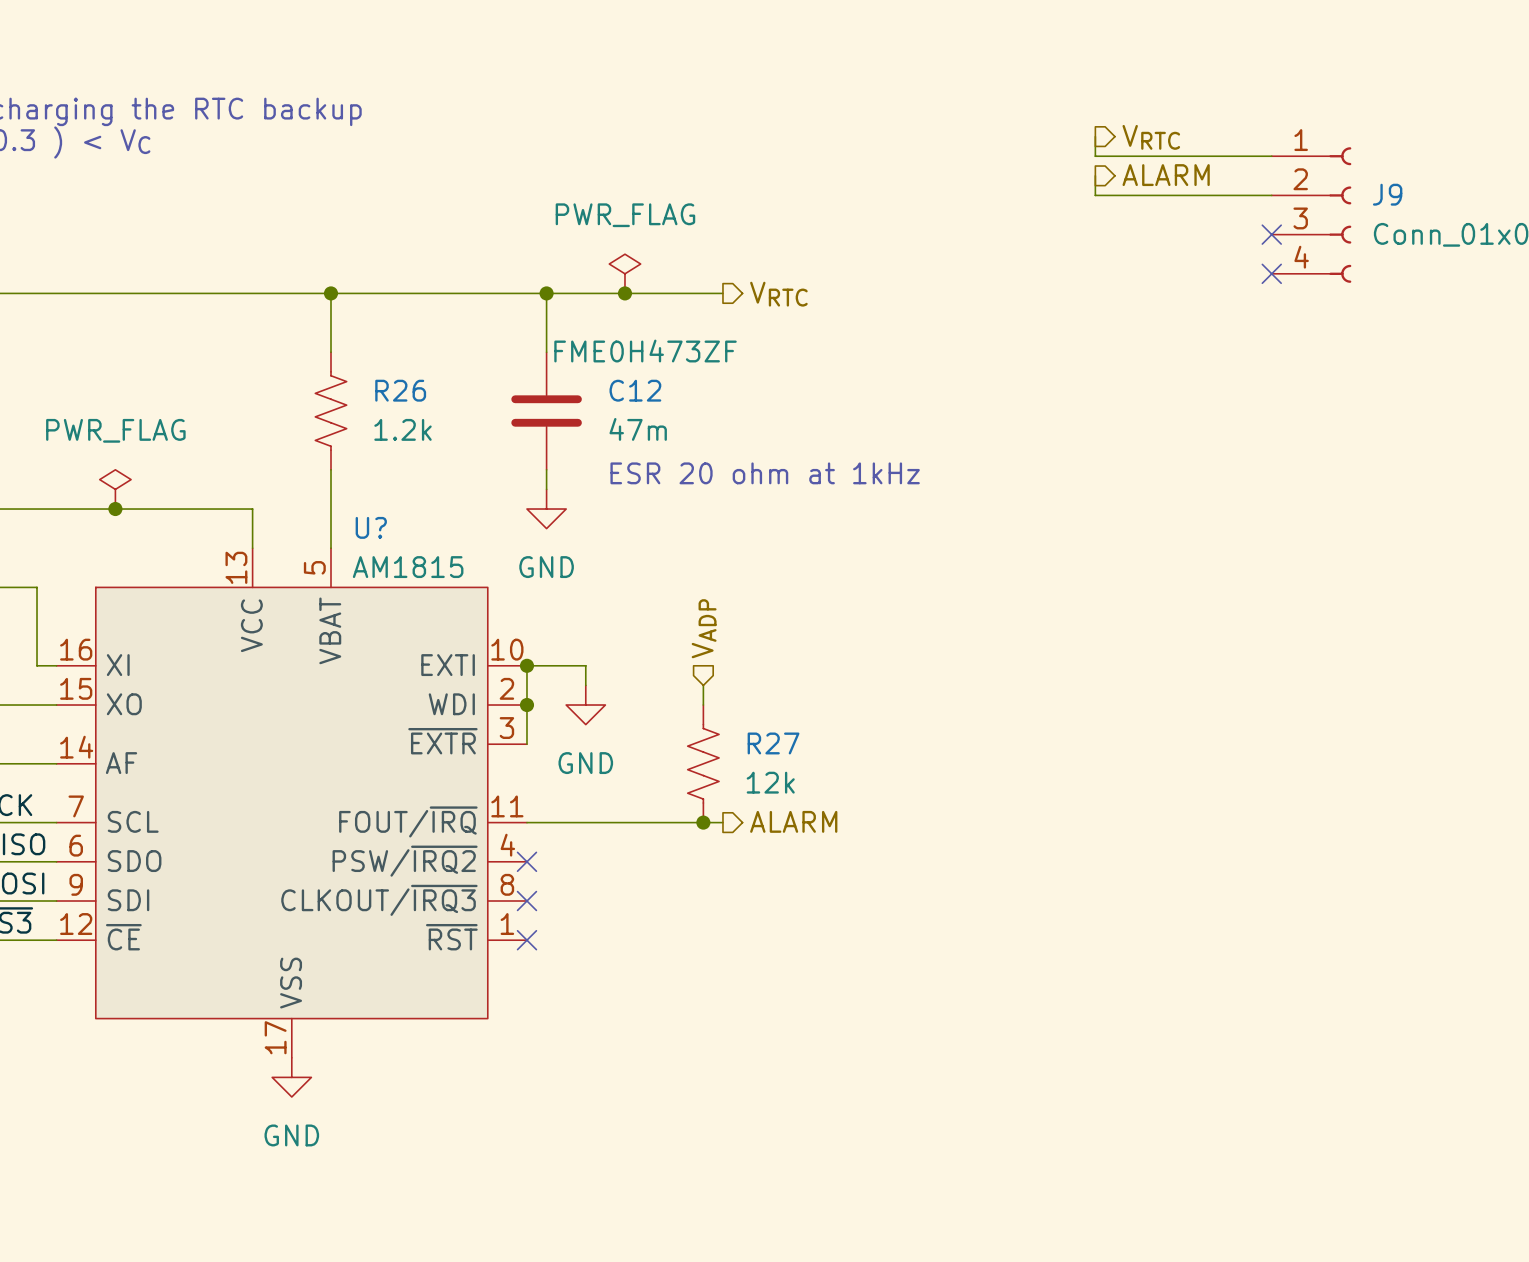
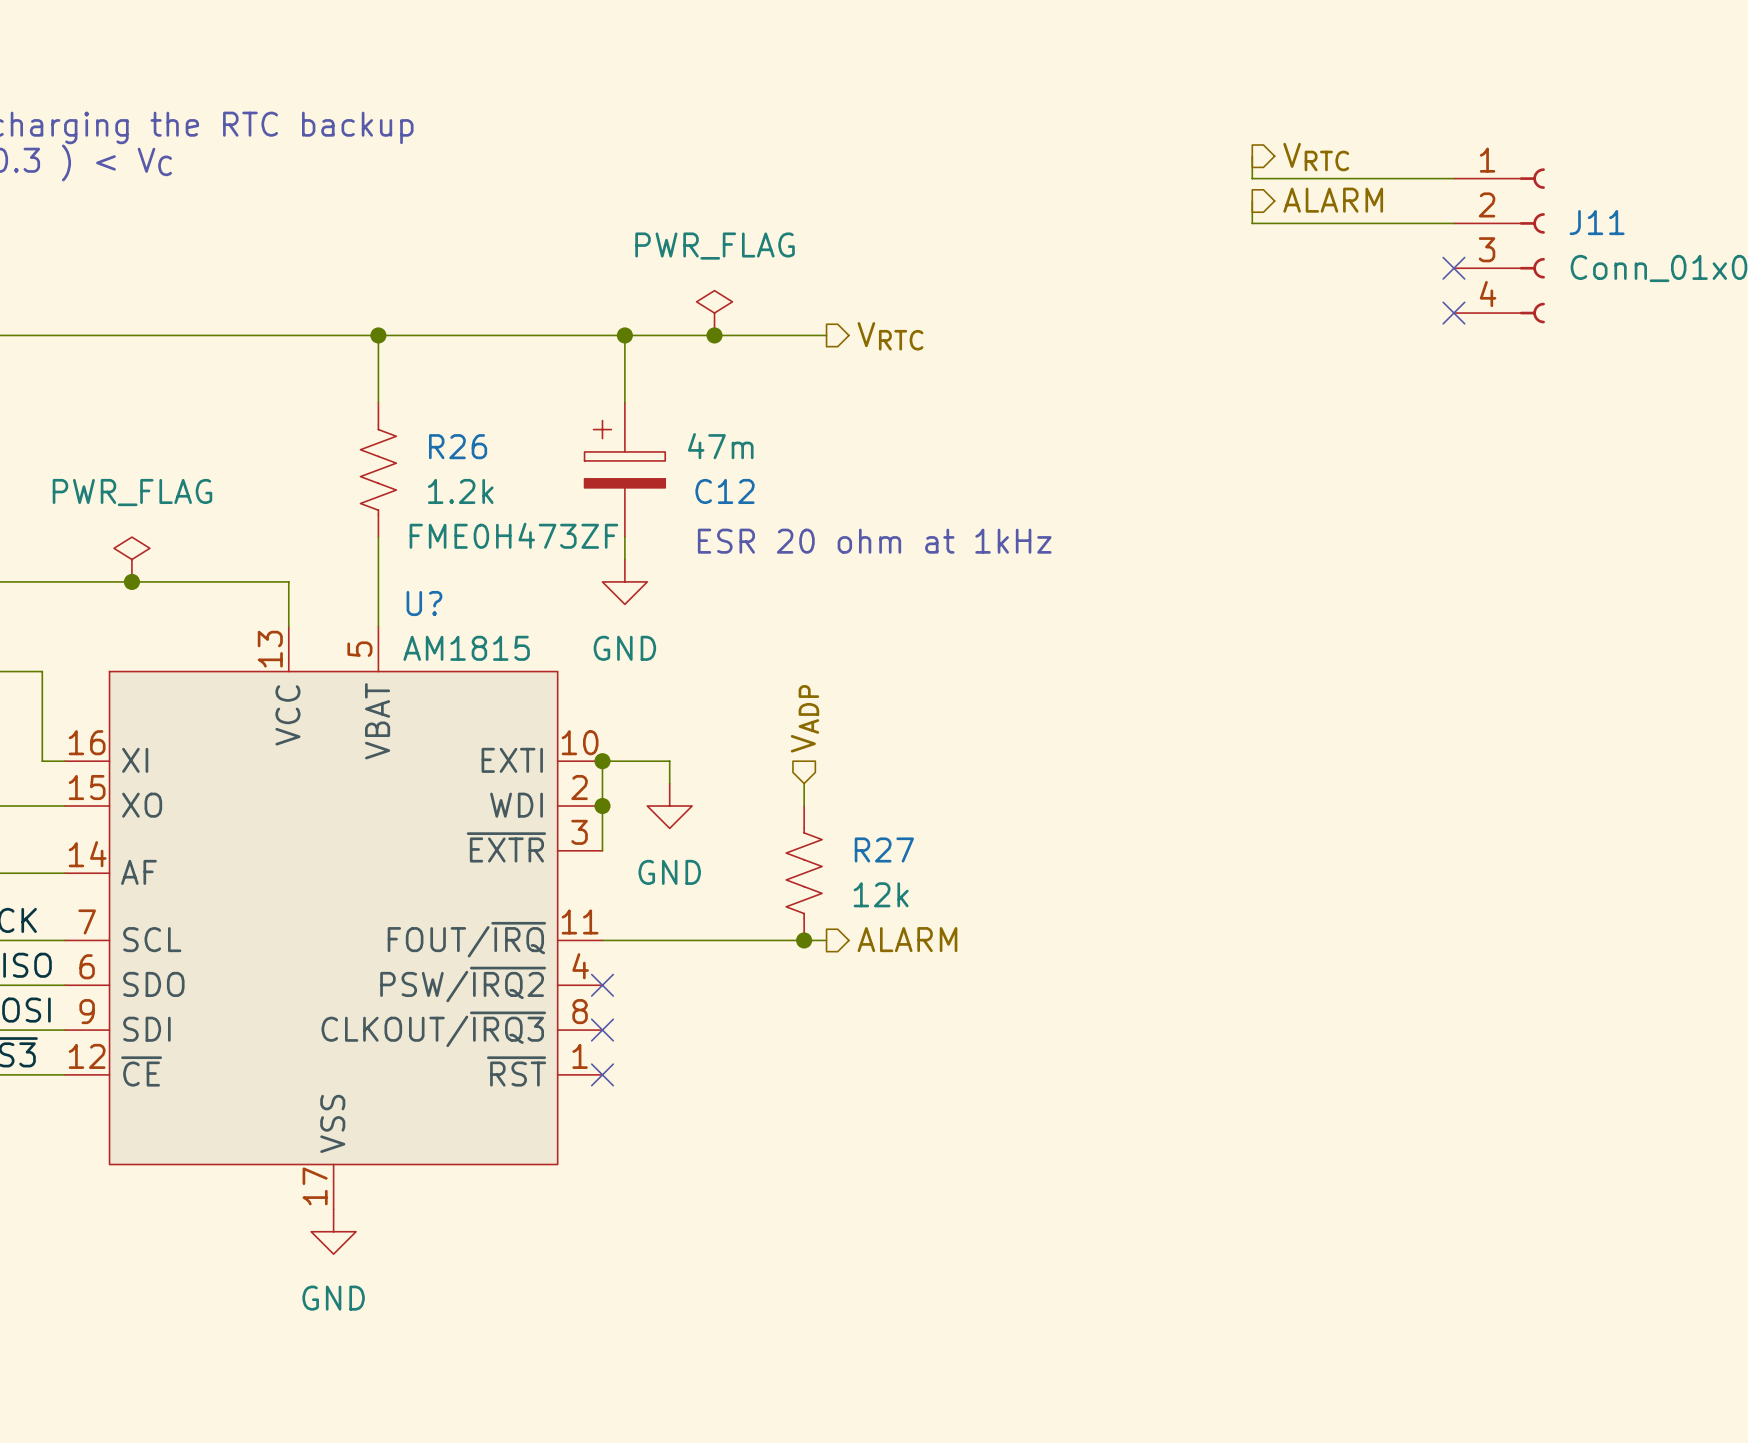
J9 name: J9 (1387, 194) -> J11 (1597, 222)
C12 text position: FME0H473ZF (645, 351) -> FME0H473ZF (513, 535)
C12 symbol: [511, 352, 582, 470] -> [584, 402, 666, 538]
C12 name position: C12 (635, 390) -> C12 (725, 491)
C12 value position: 47m (638, 429) -> 47m (720, 446)

